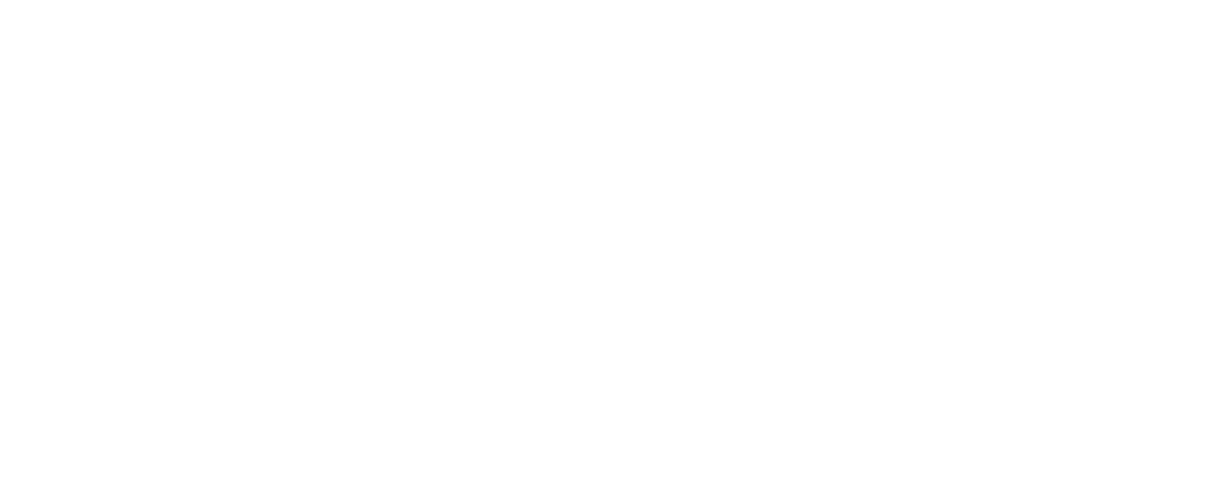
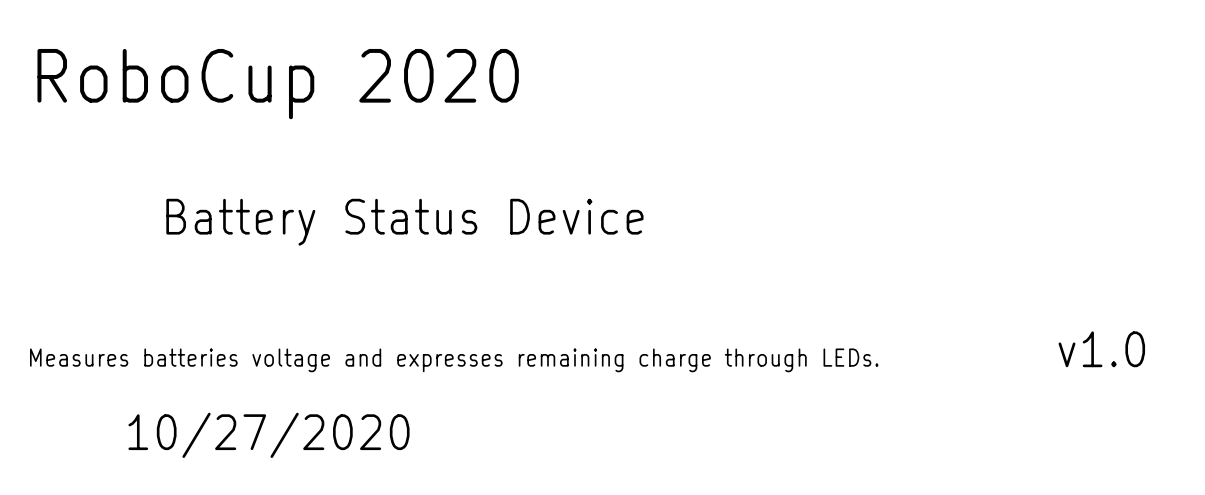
text: none -> RoboCup 2020 (278, 84)
text: none -> Battery Status Device (404, 222)
text: none -> v1.0 (1101, 349)
text: none -> Measures batteries voltage and expresses remaining charge through LEDs. (454, 360)
text: none -> 10/27/2020 (269, 435)

